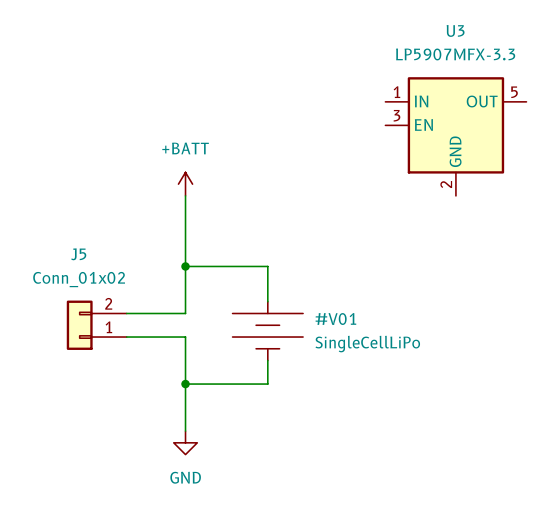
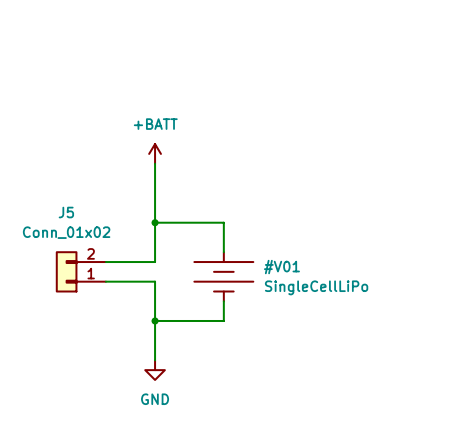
U3: LP5907MFX-3.3 (455, 136) -> none

